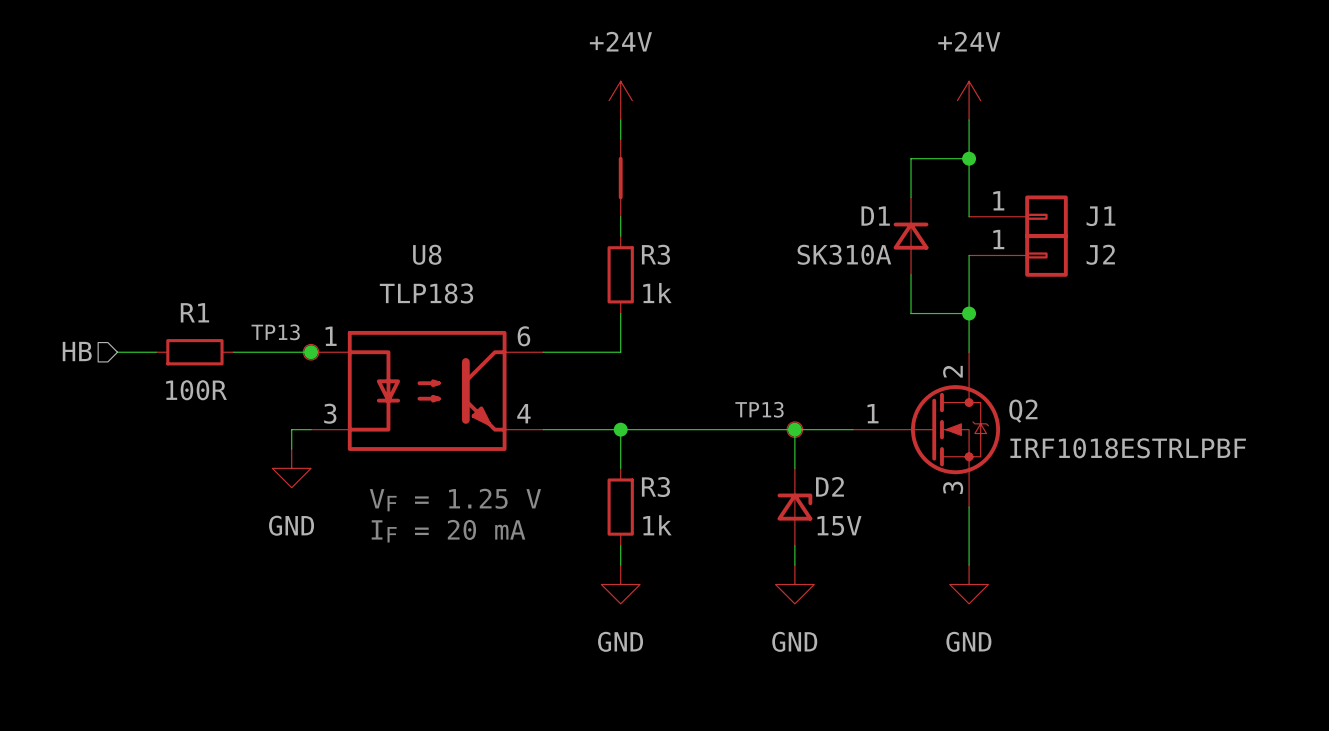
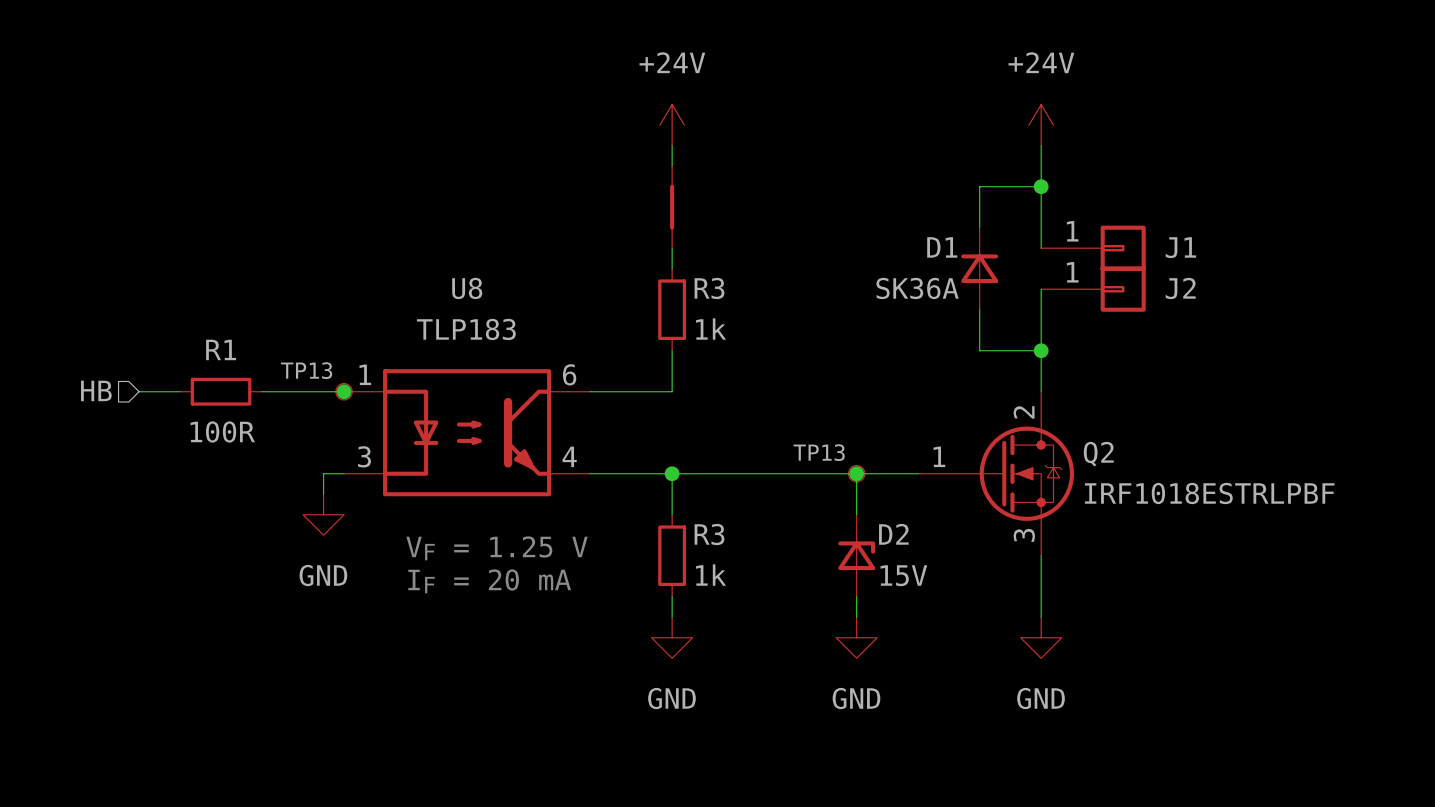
D1 value: SK310A (844, 254) -> SK36A (917, 288)

